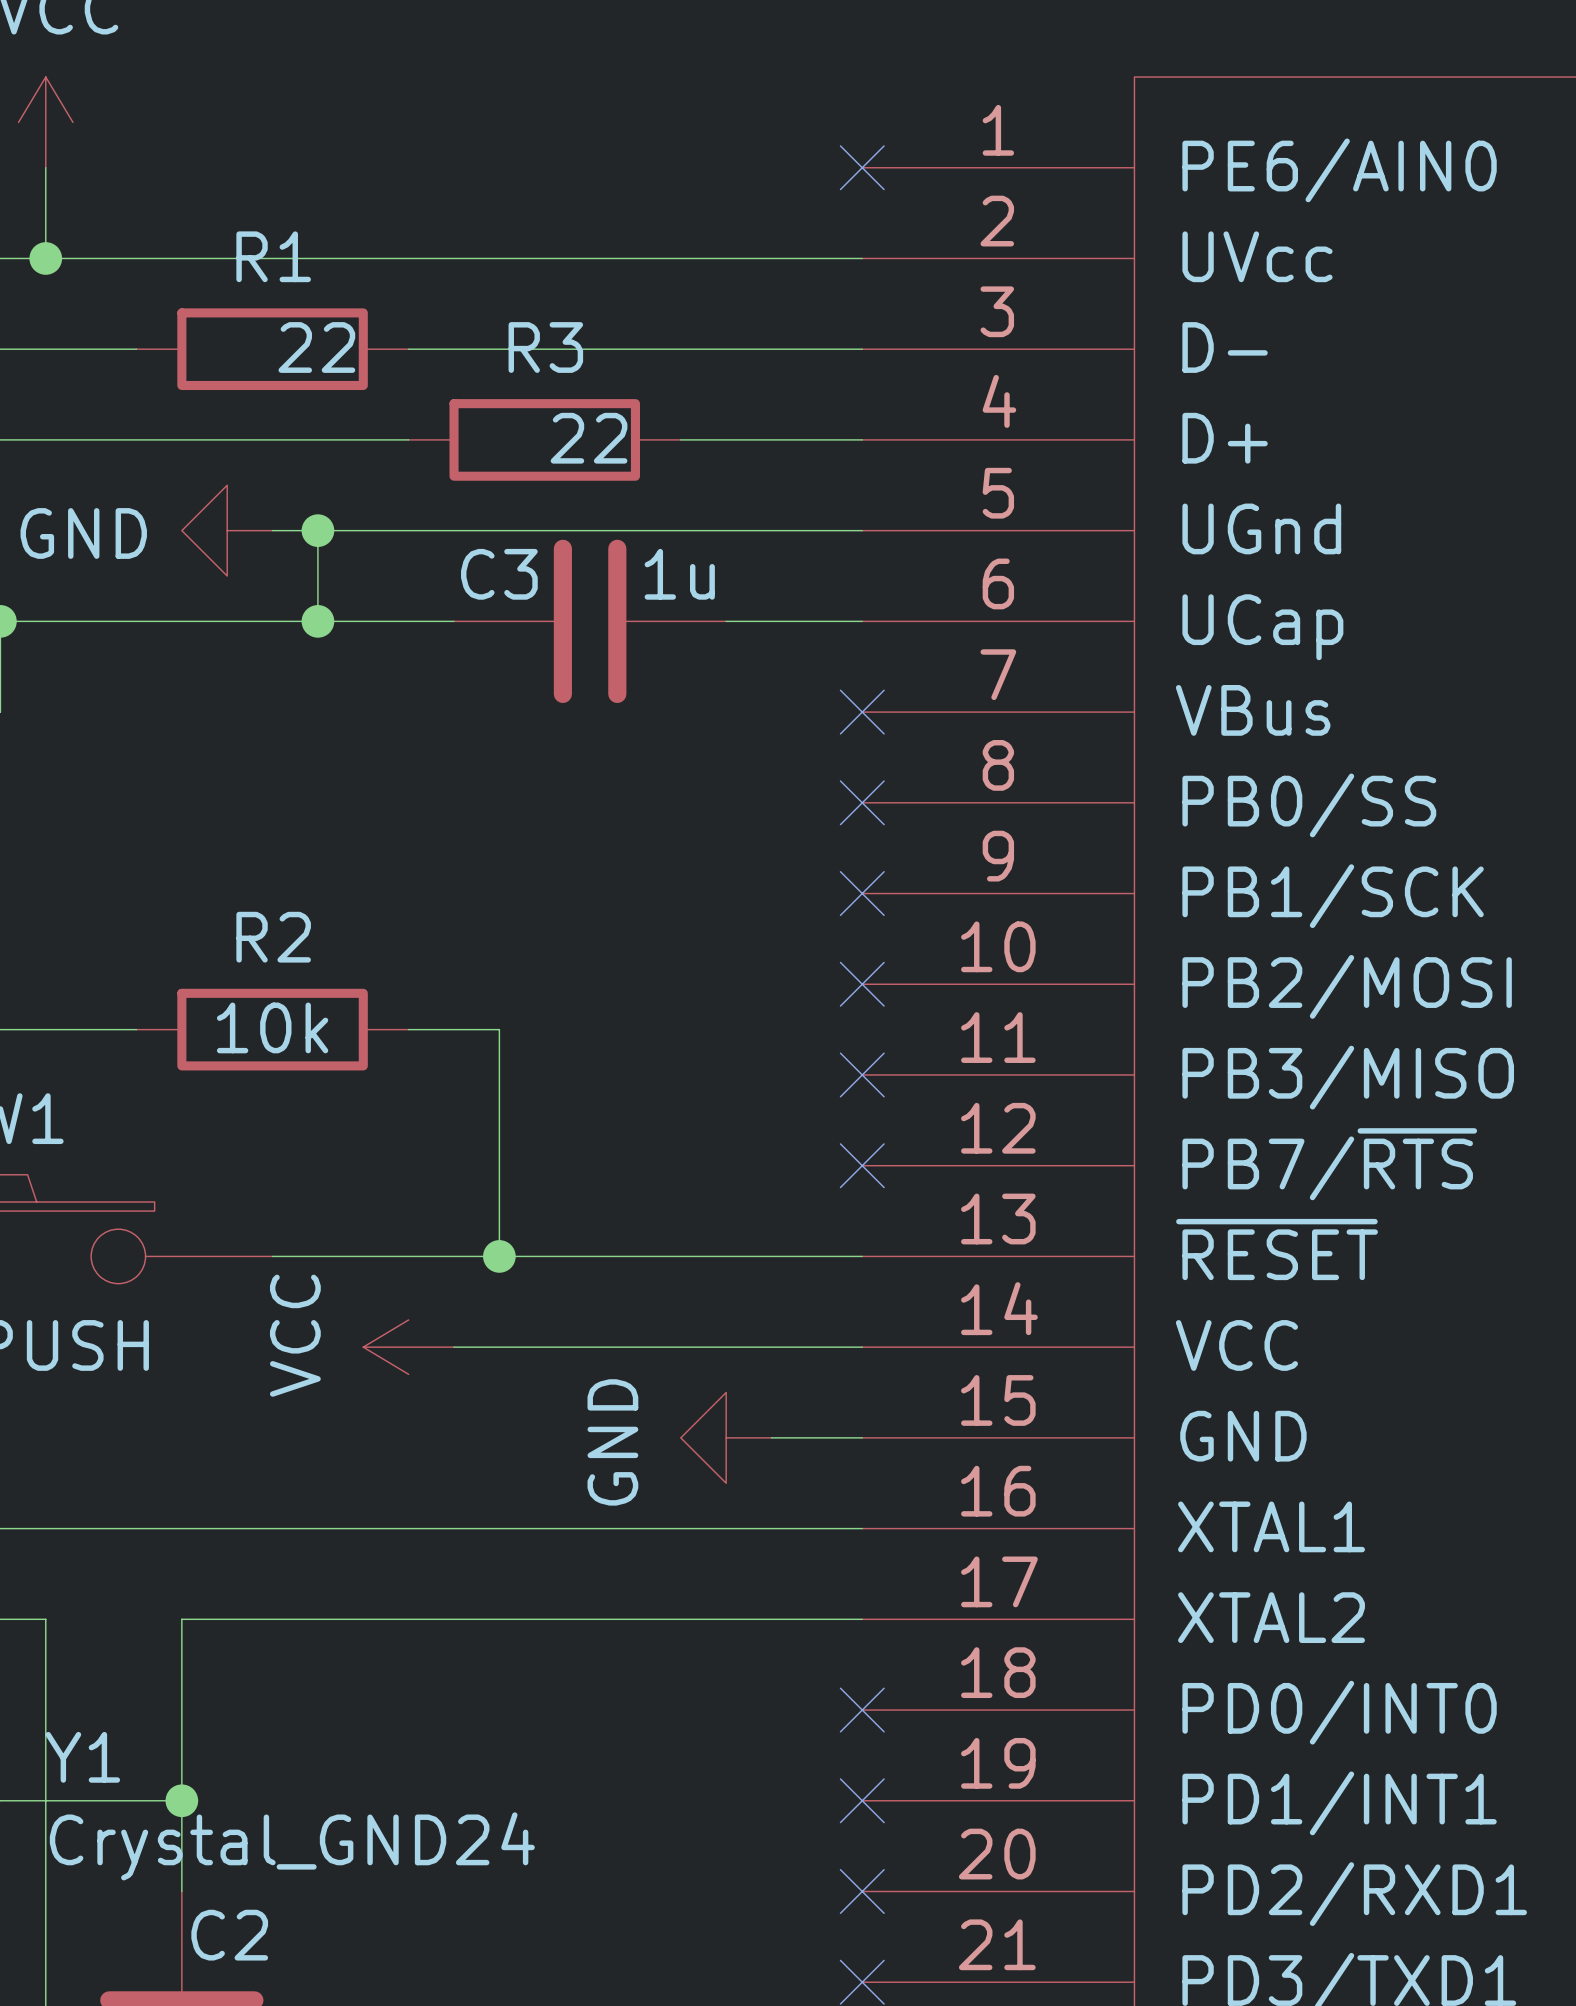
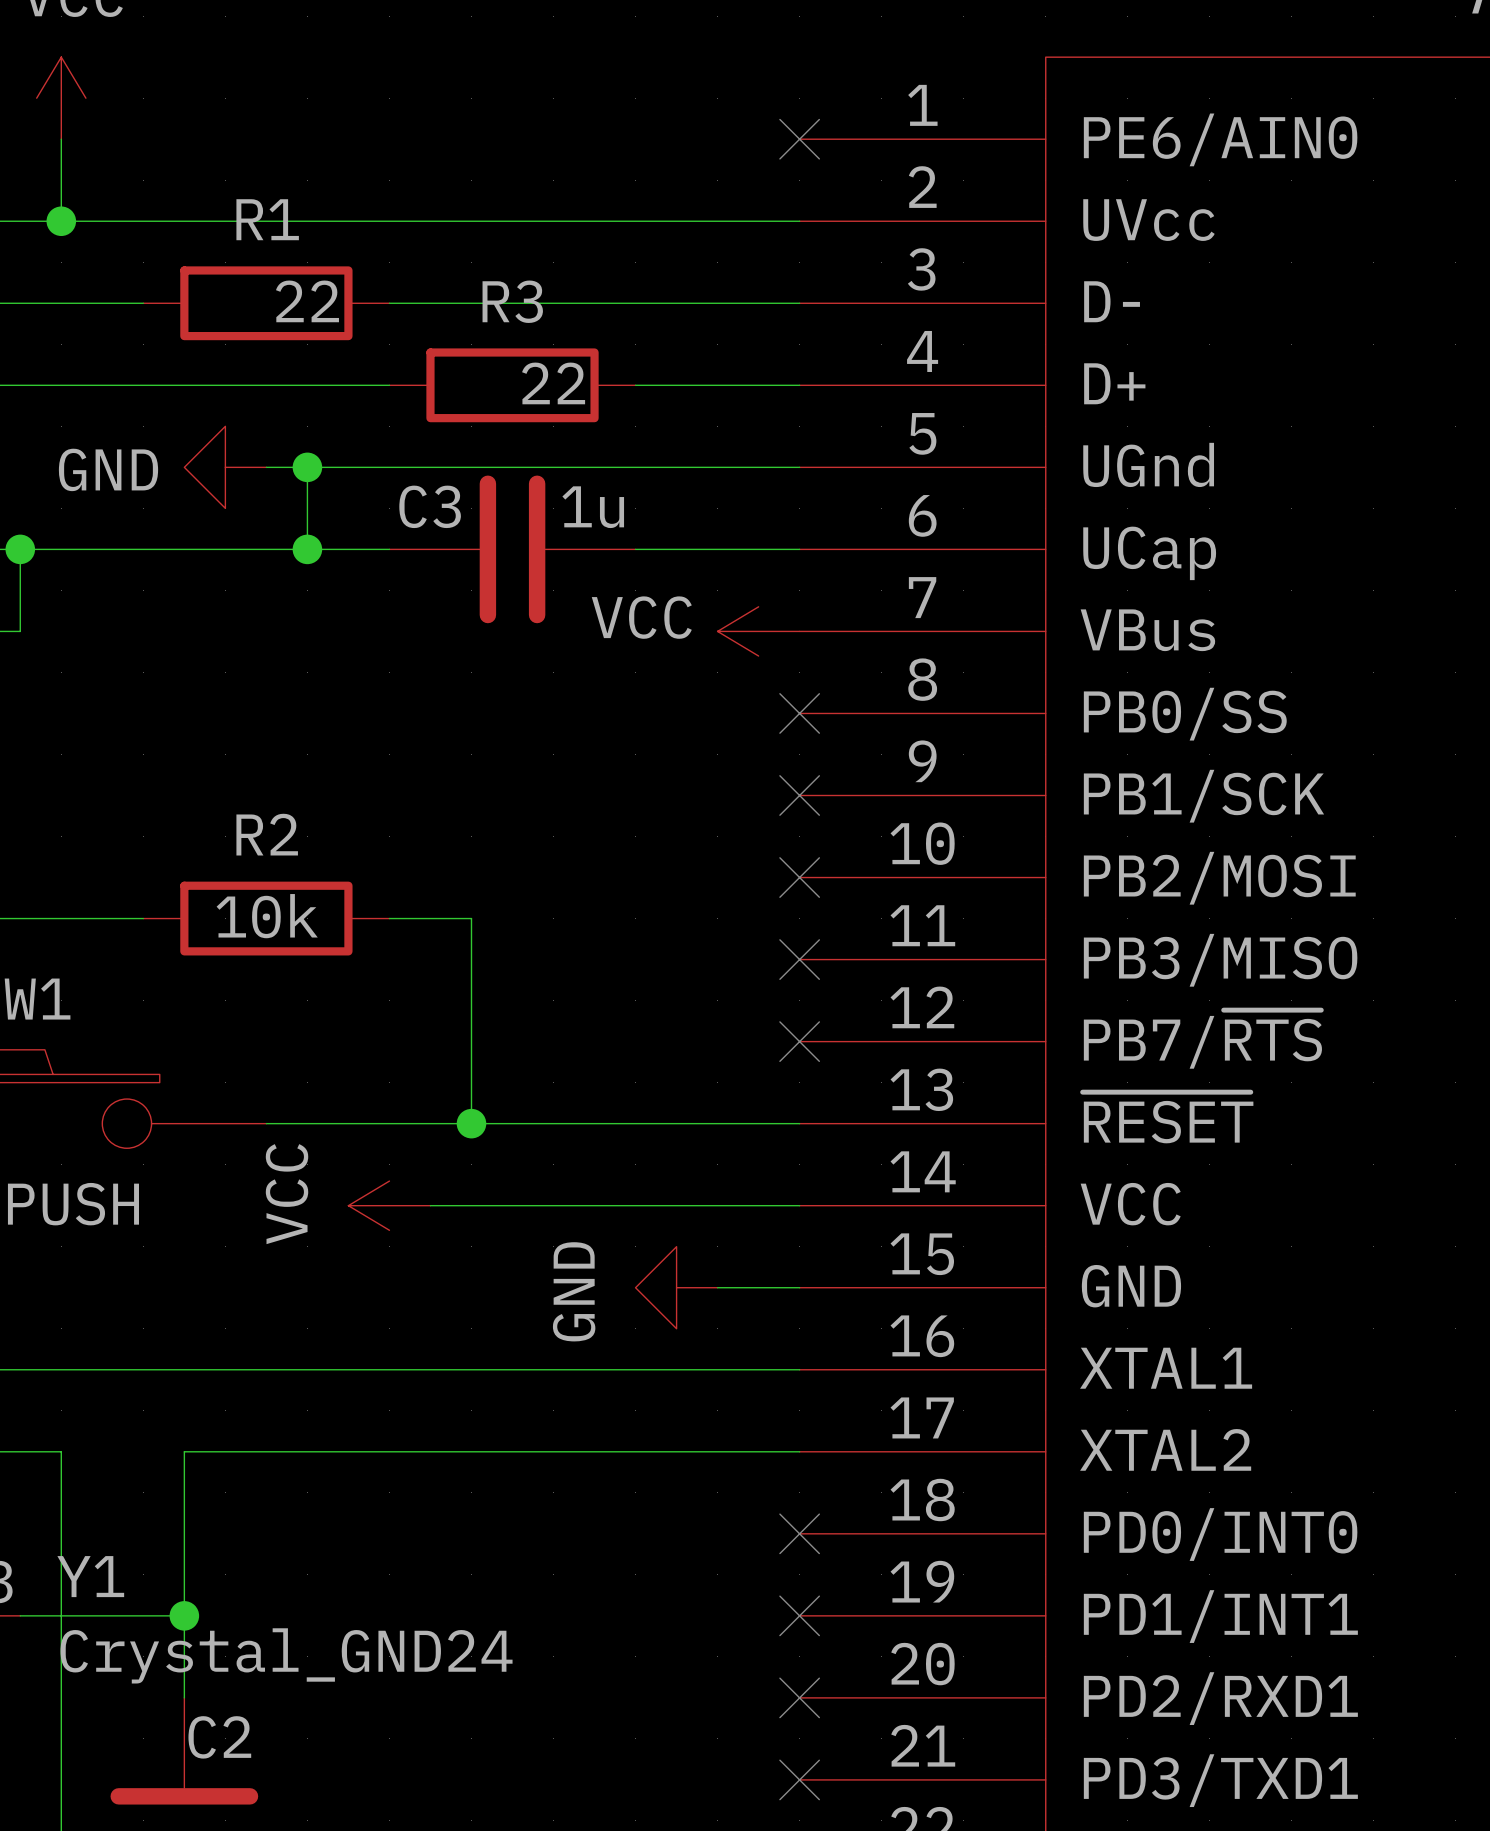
C3 position: (590, 621) -> (512, 549)
power symbol: none -> VCC (758, 631)
no-connect mark: (862, 712) -> none

